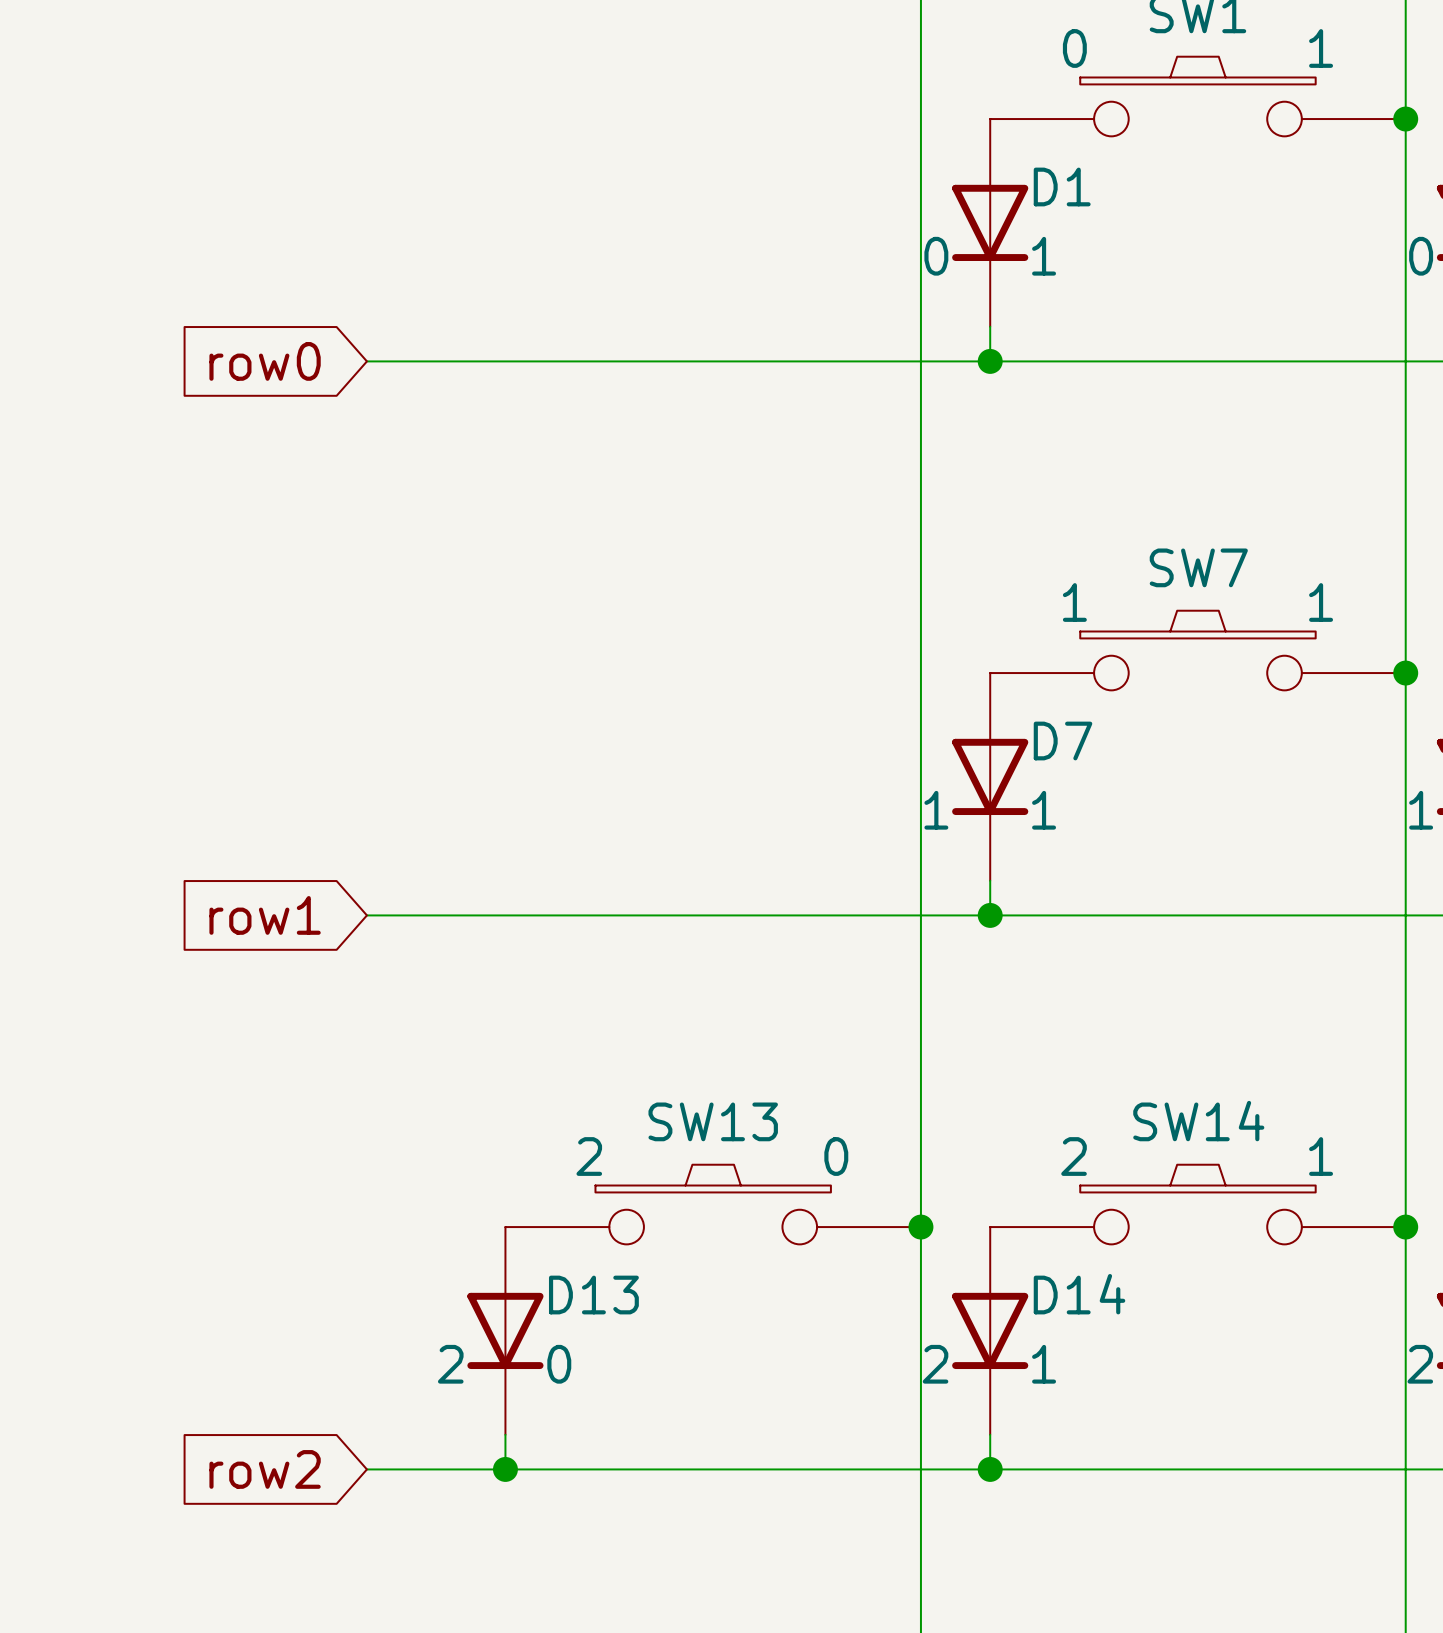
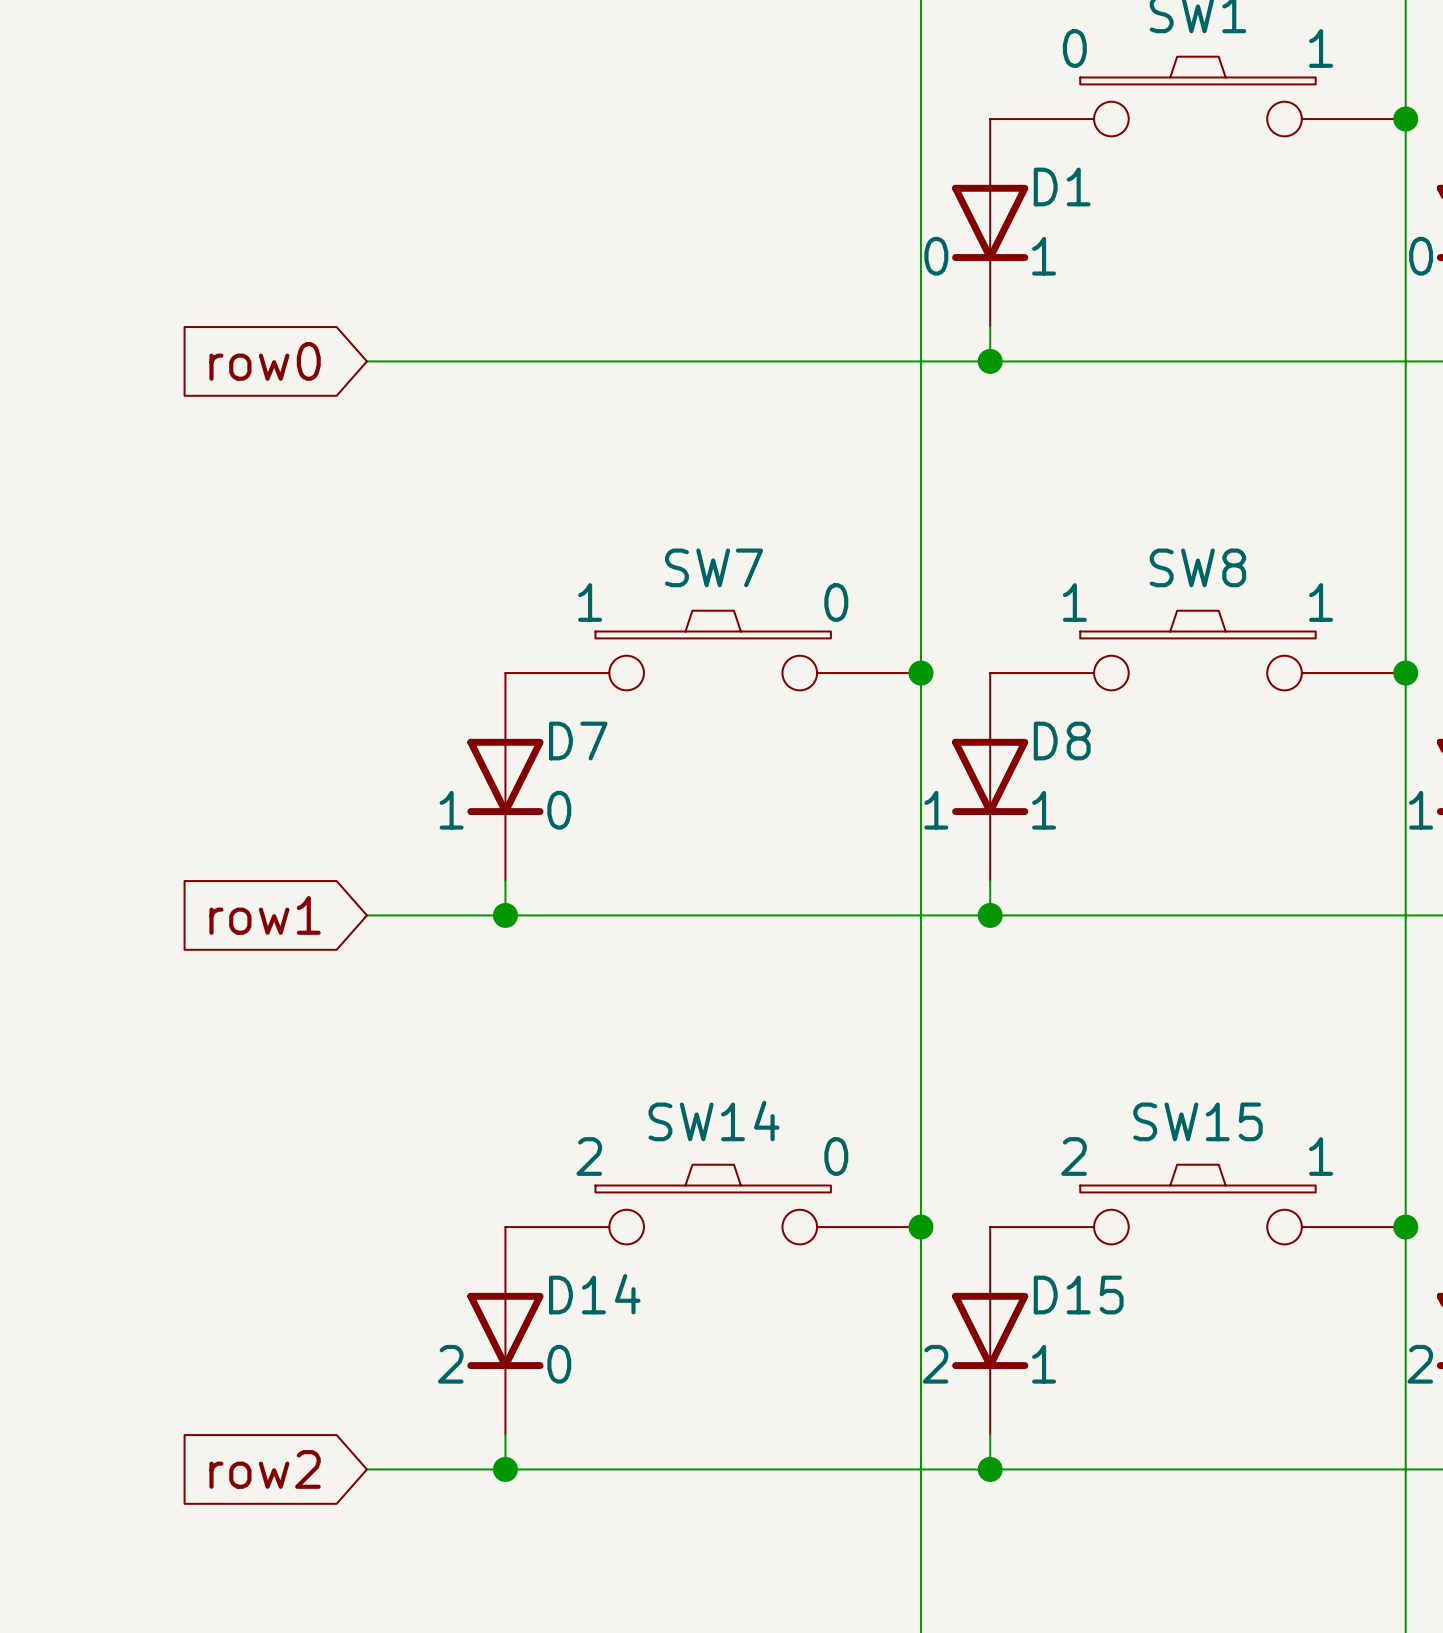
SW7 name: SW7 (1198, 567) -> SW8 (1197, 567)
SW7: none -> (713, 650)
junction: none -> (920, 673)
D7 name: D7 (1063, 741) -> D8 (1062, 741)
D7: none -> (505, 776)
wire: none -> (505, 880) (505, 915)
junction: none -> (505, 915)
SW13 name: SW13 (713, 1121) -> SW14 (714, 1121)
SW14 name: SW14 (1198, 1121) -> SW15 (1197, 1121)
D14 name: D14 (1079, 1294) -> D15 (1078, 1295)
D13 name: D13 (593, 1295) -> D14 (594, 1294)

